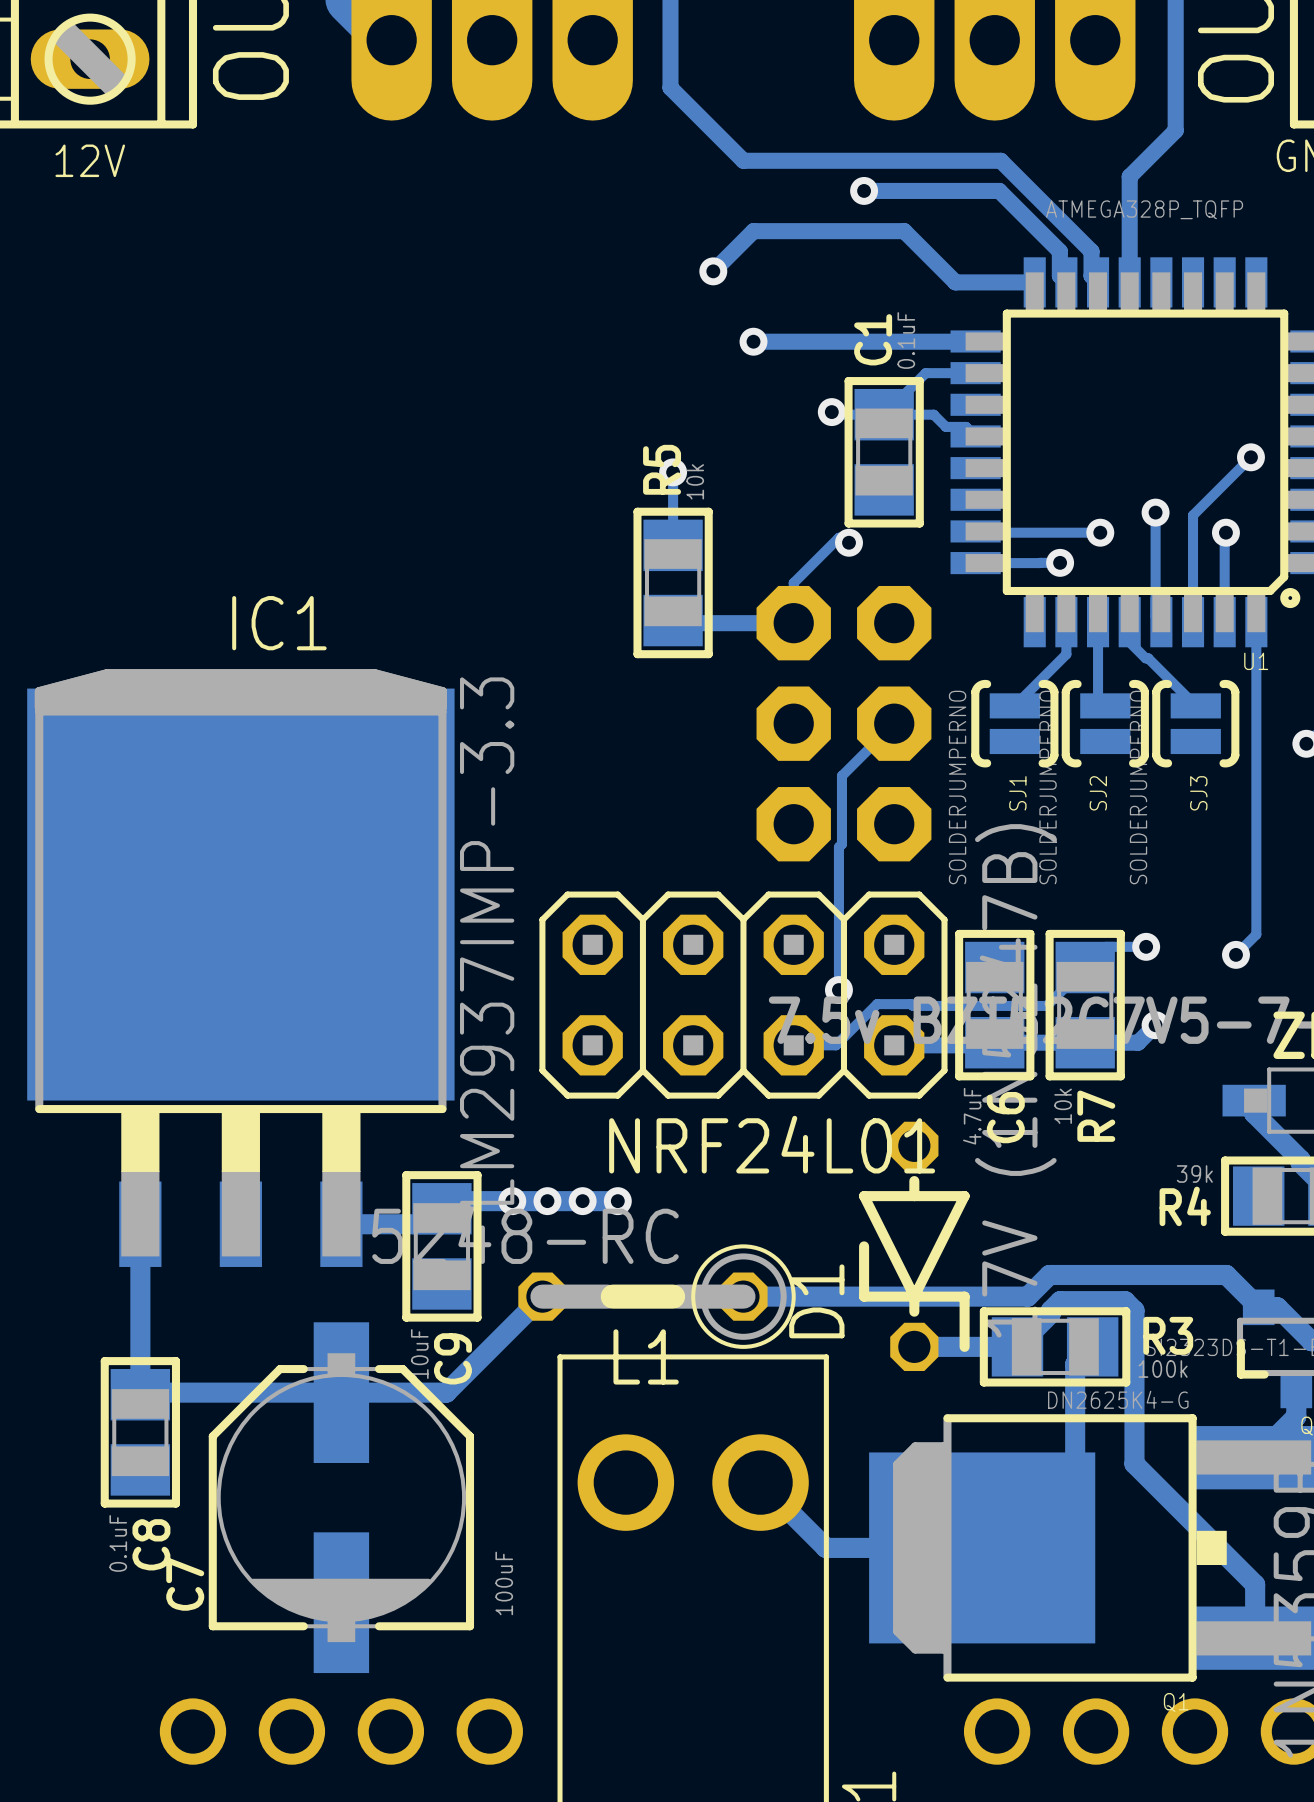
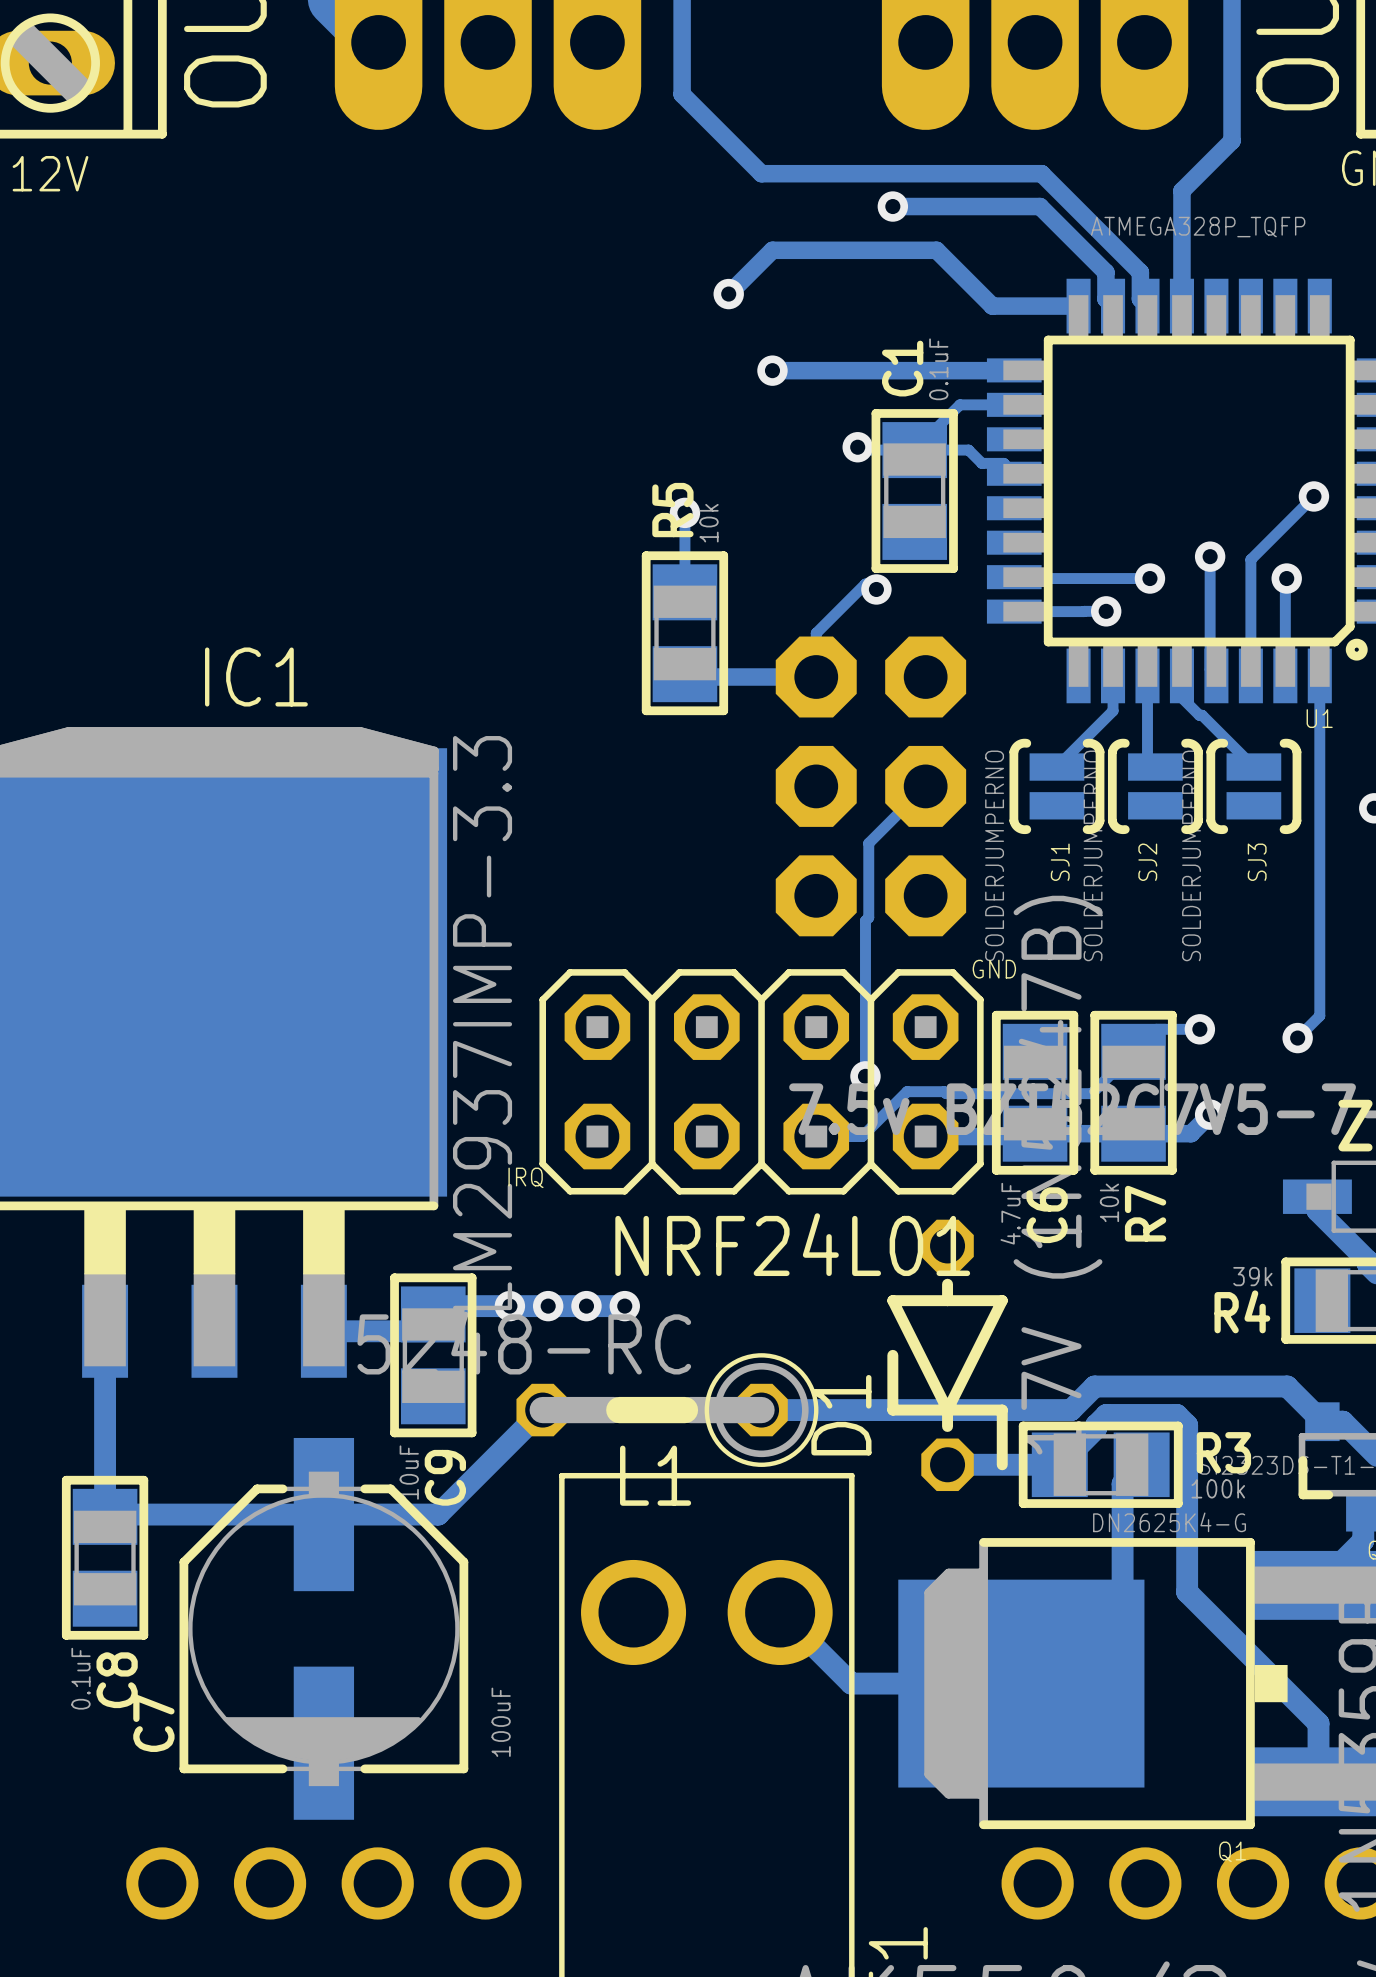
text: none -> GND (994, 969)
text: none -> IRQ (525, 1177)

